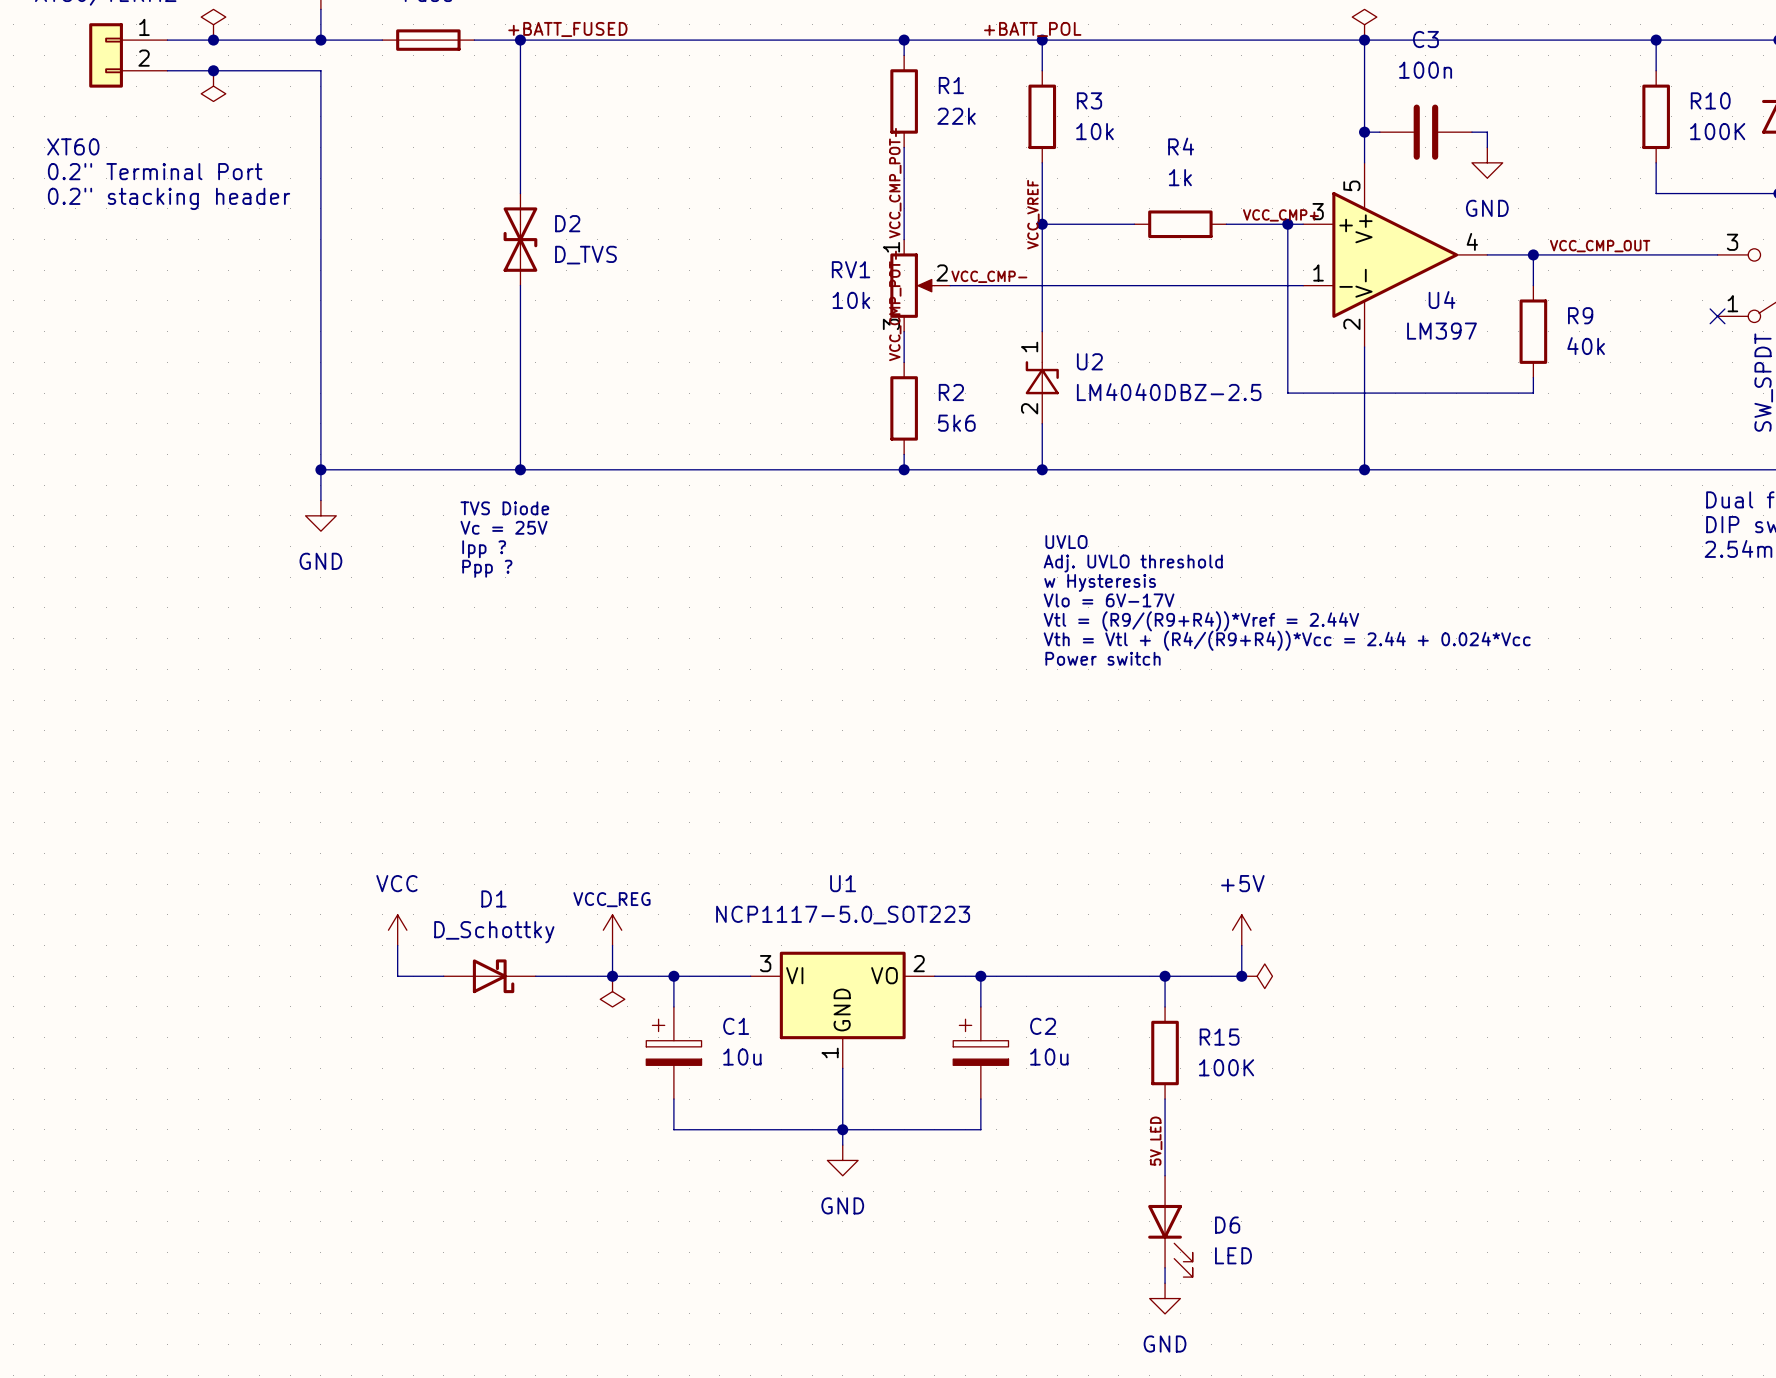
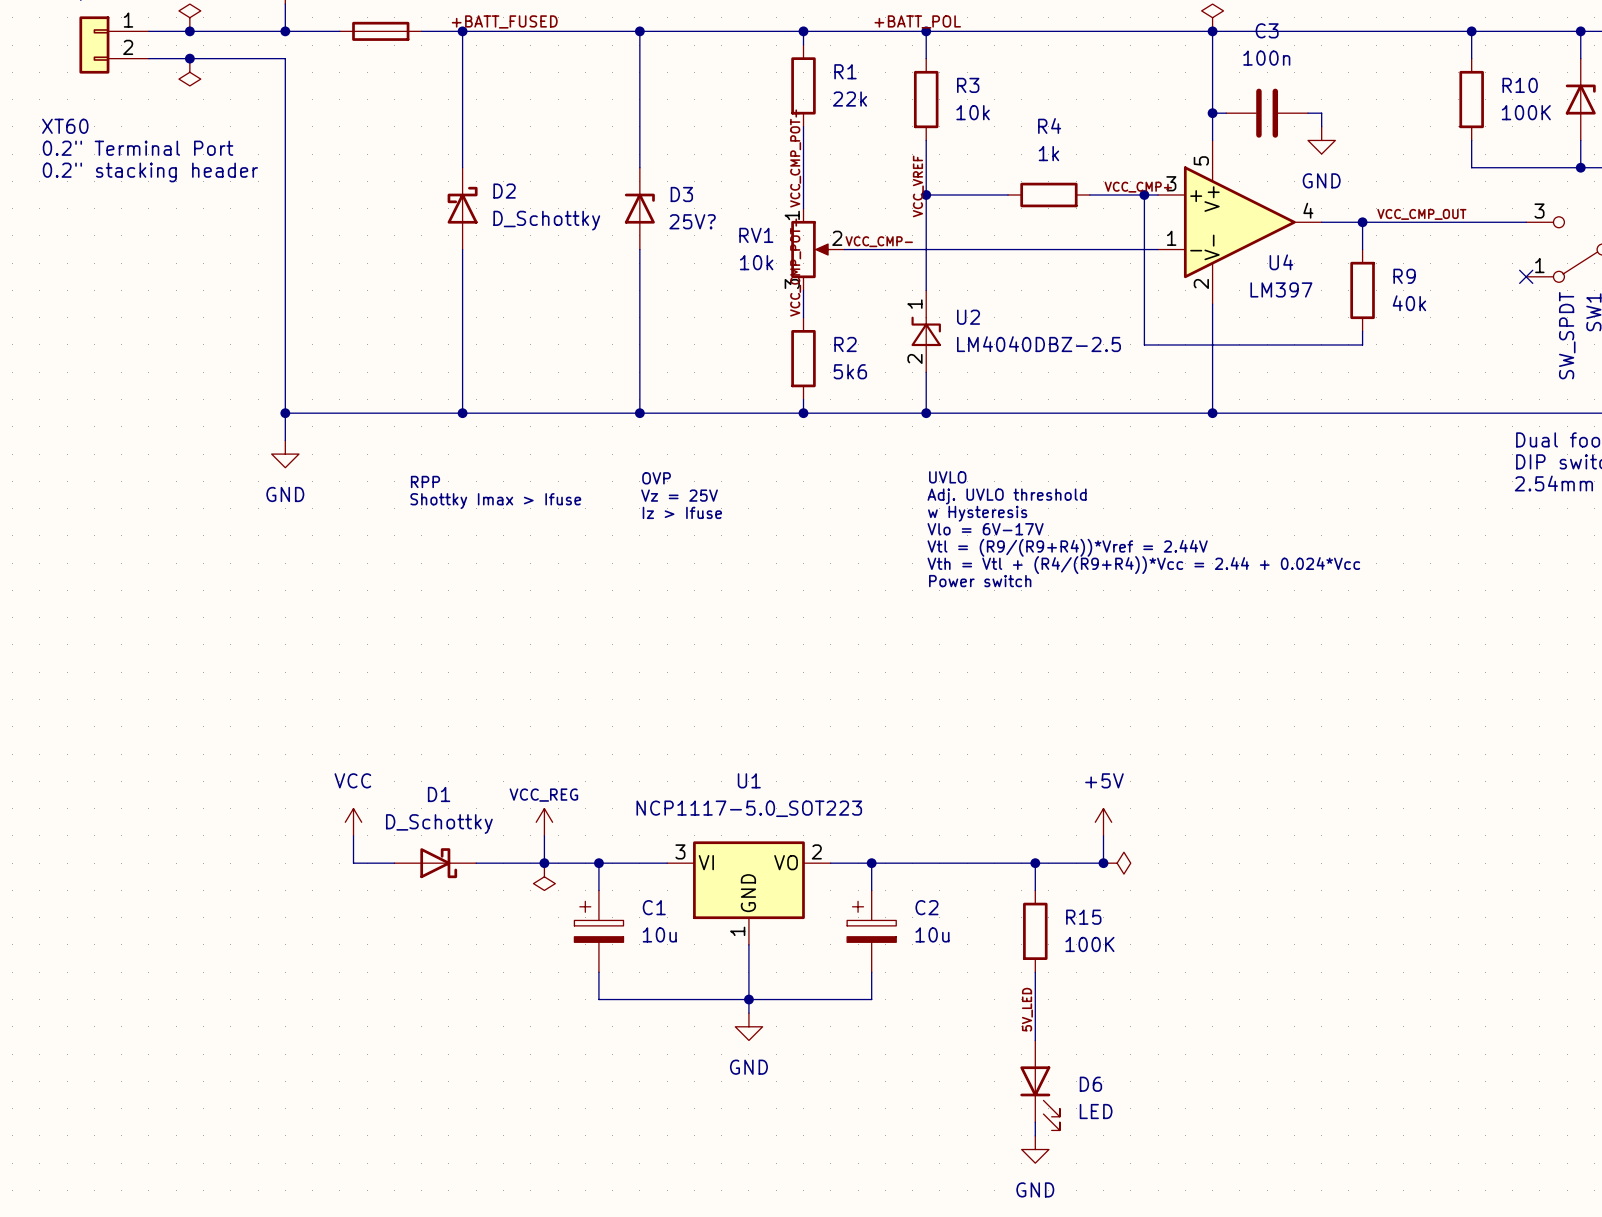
wire: none -> (639, 31) (639, 167)
junction: none -> (639, 31)
D2 symbol: [503, 193, 538, 286] -> [447, 167, 478, 250]
D3: none -> 25V? (639, 208)
D2 value: D_TVS (585, 255) -> D_Schottky (546, 220)
wire: none -> (639, 249) (639, 413)
junction: none -> (639, 413)
text: TVS Diode (504, 508) -> none
text: Vc = 25V (504, 527) -> none
text: none -> OVP (656, 478)
text: Ipp ? (484, 549) -> RPP (425, 481)
text: none -> Vz = 25V (679, 495)
text: Ppp ? (487, 568) -> Shottky Imax > Ifuse (495, 501)
text: none -> Iz > Ifuse (682, 512)

